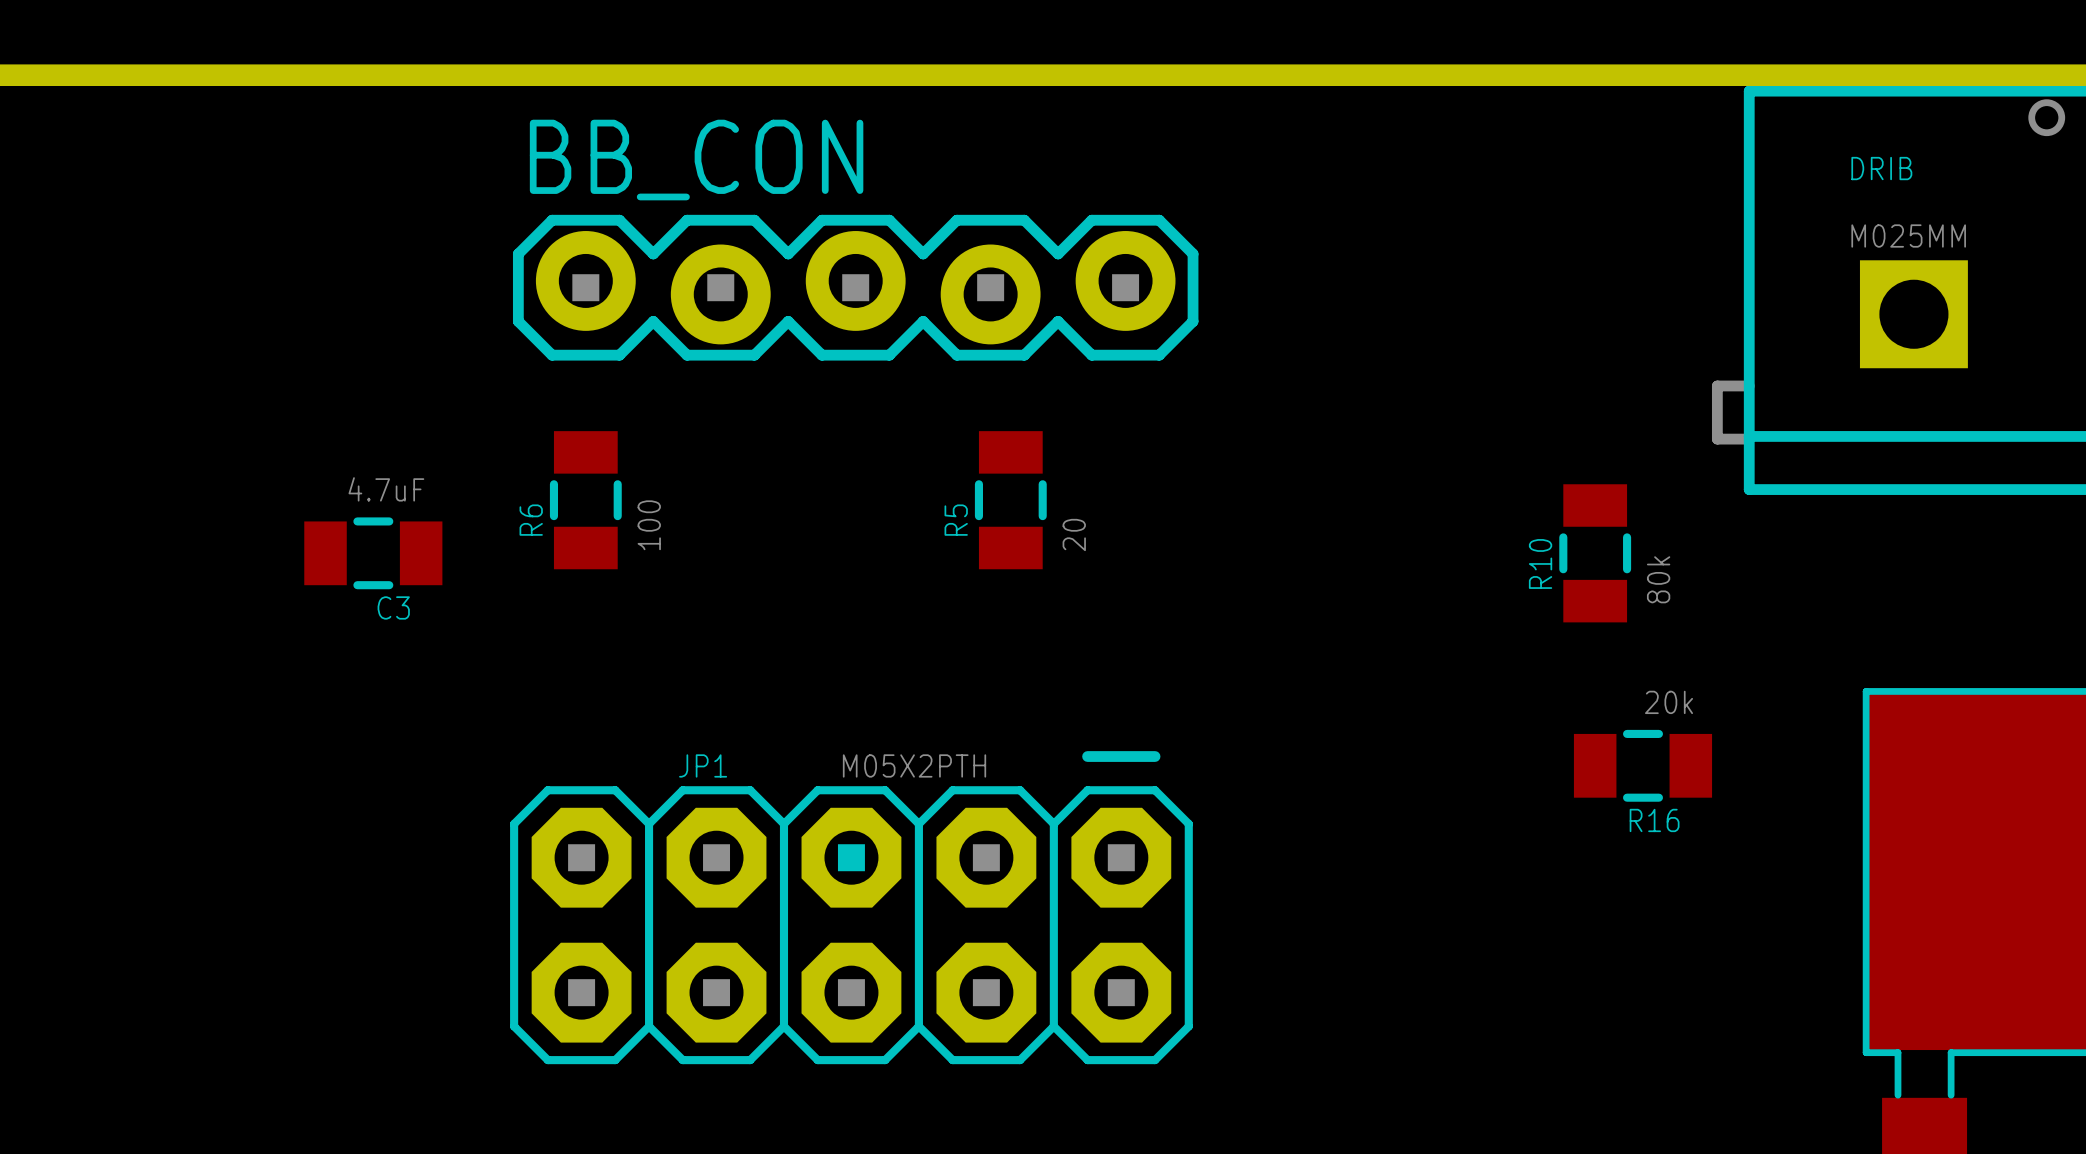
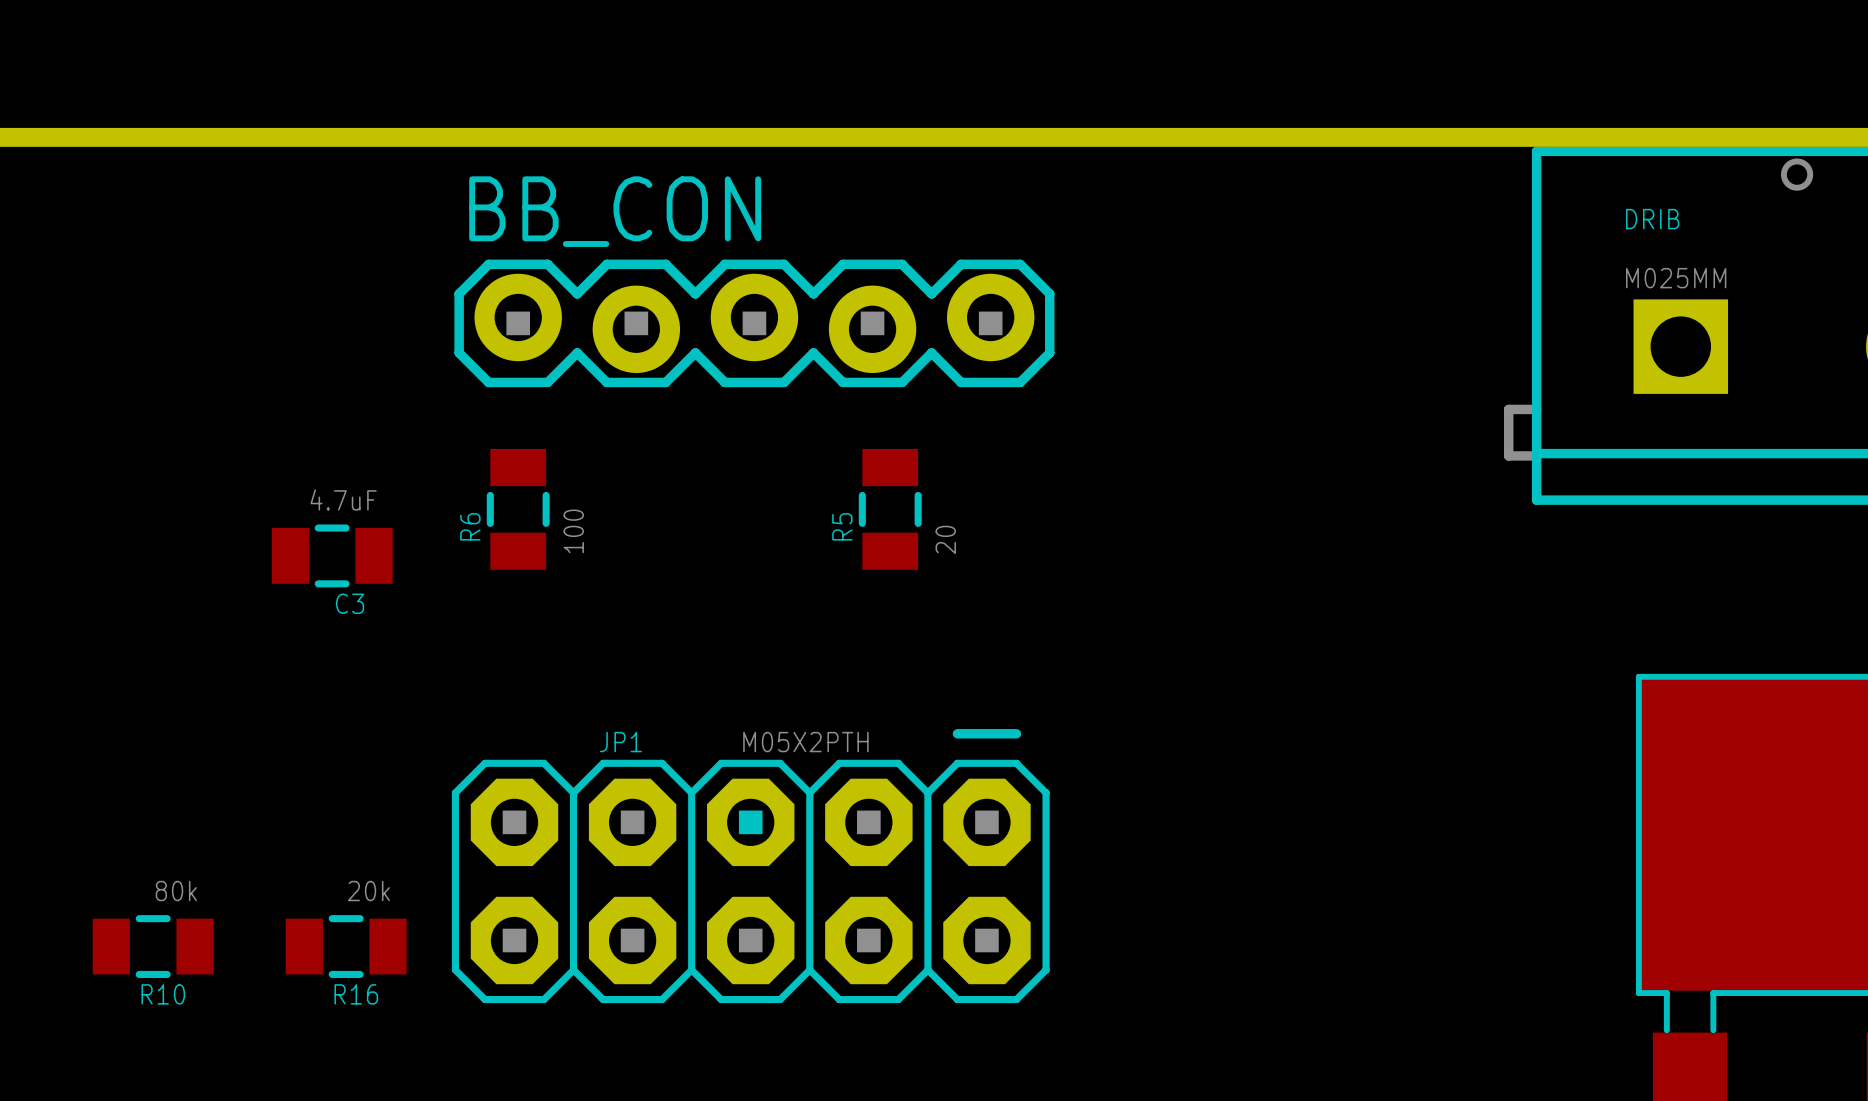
R10 rotation: 0° (1595, 553) -> 90° clockwise (153, 946)
R10 position: (1595, 553) -> (153, 946)
R16 position: (1643, 765) -> (346, 946)

